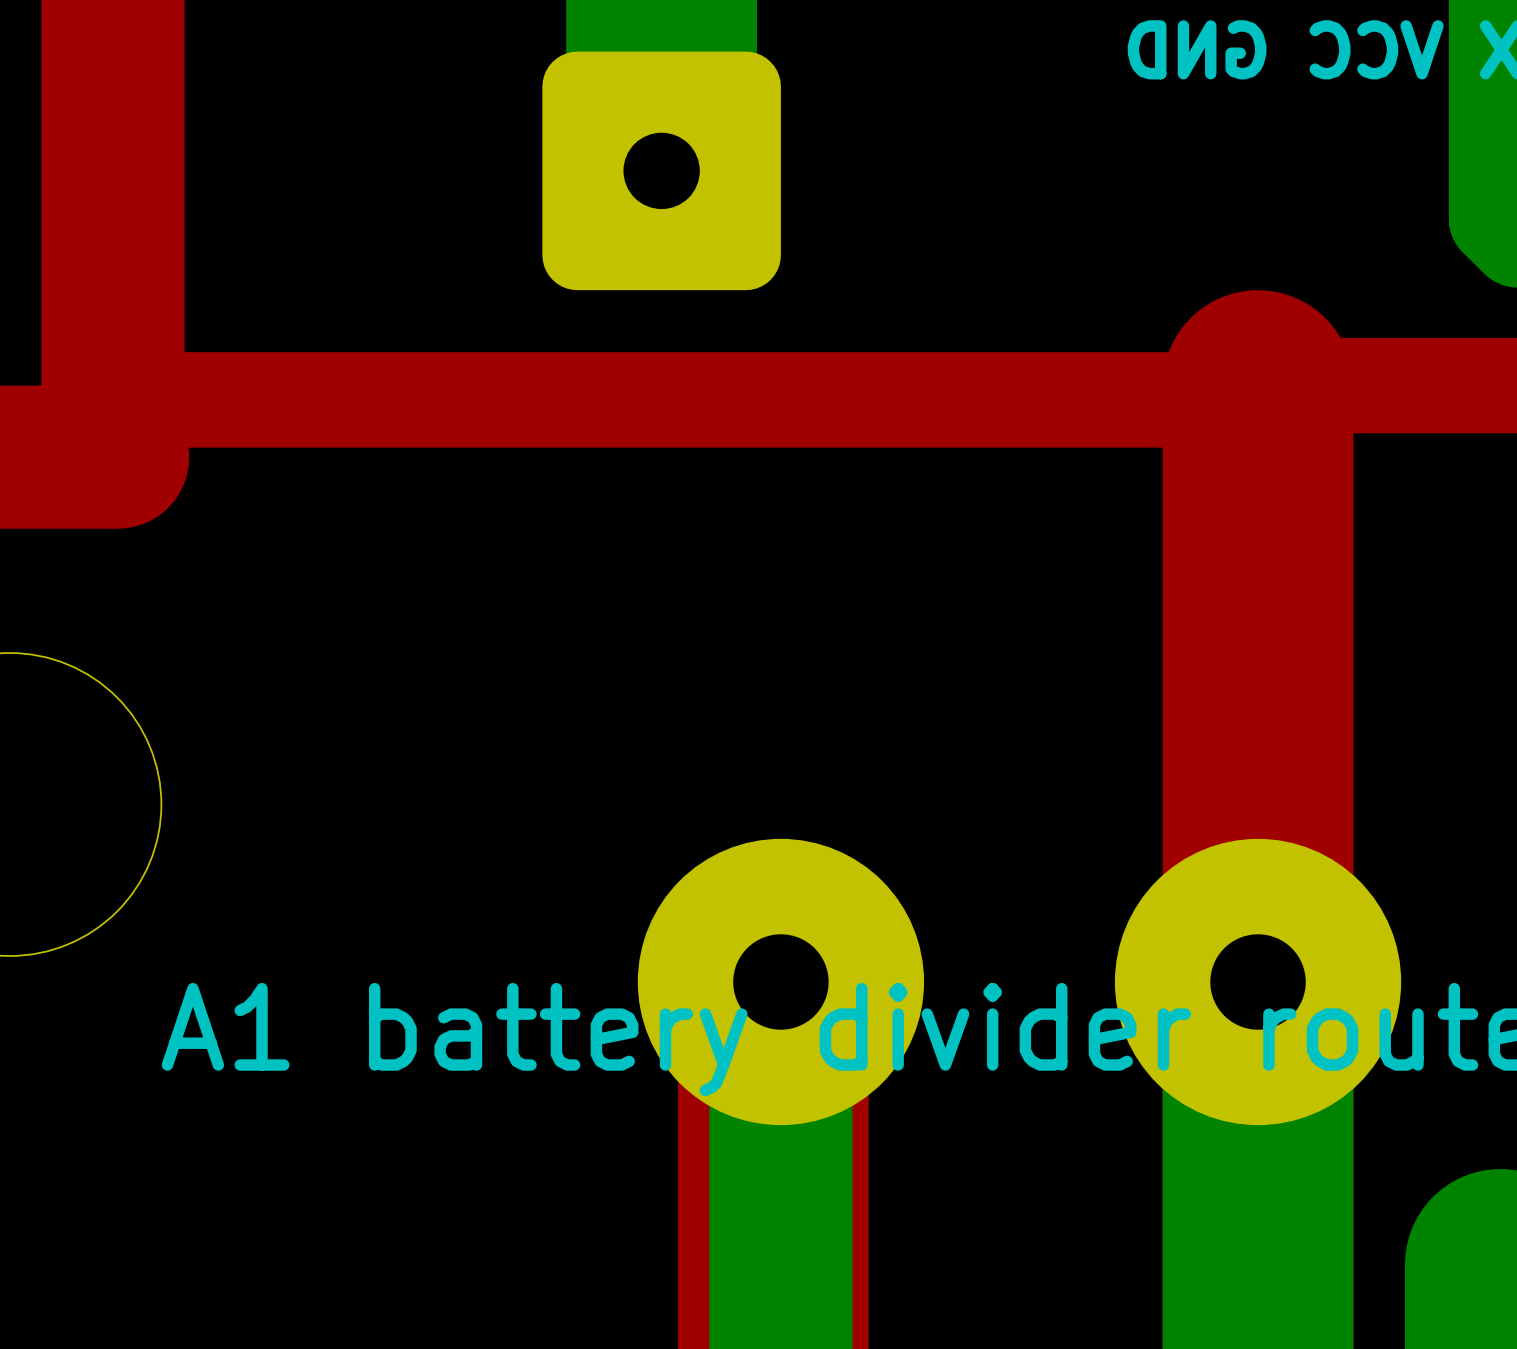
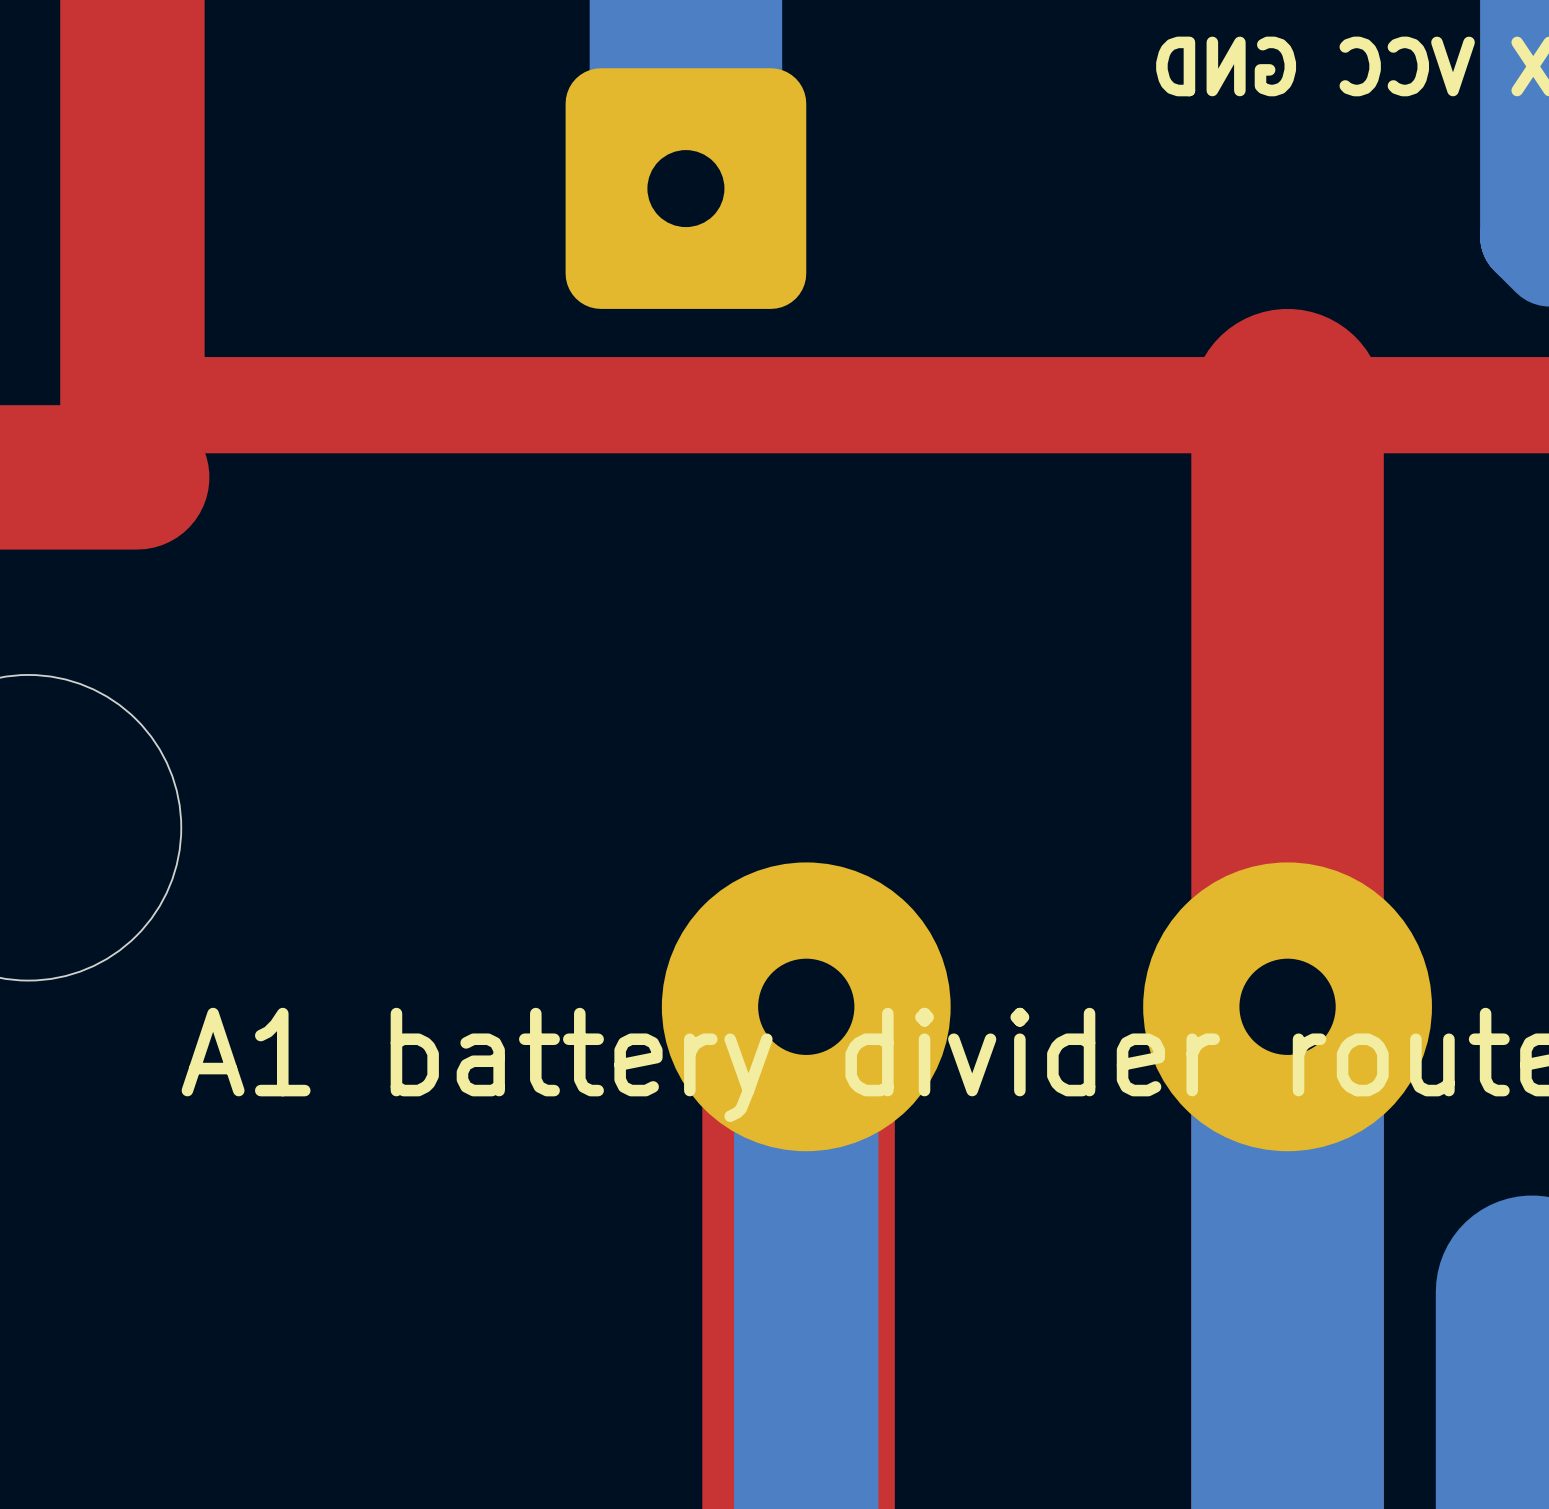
top track: (1258, 385) (1243, 399) (122, 399) (112, 390) -> (1287, 405) (137, 405) (132, 409)

